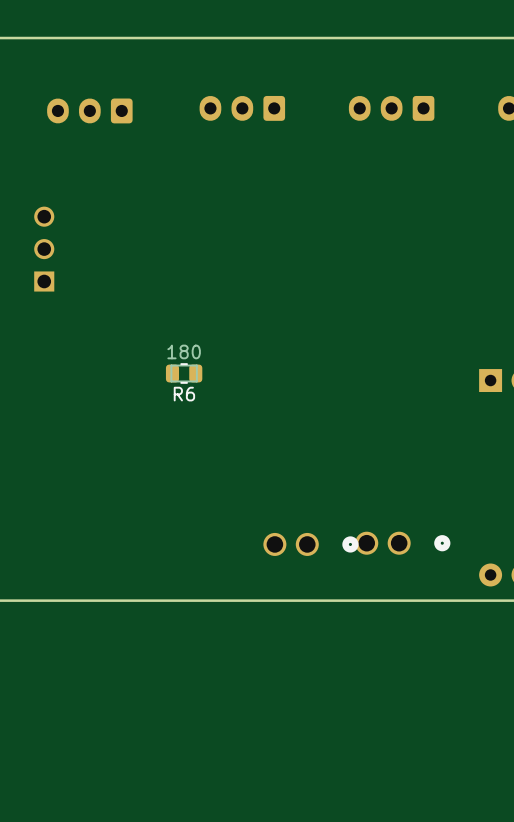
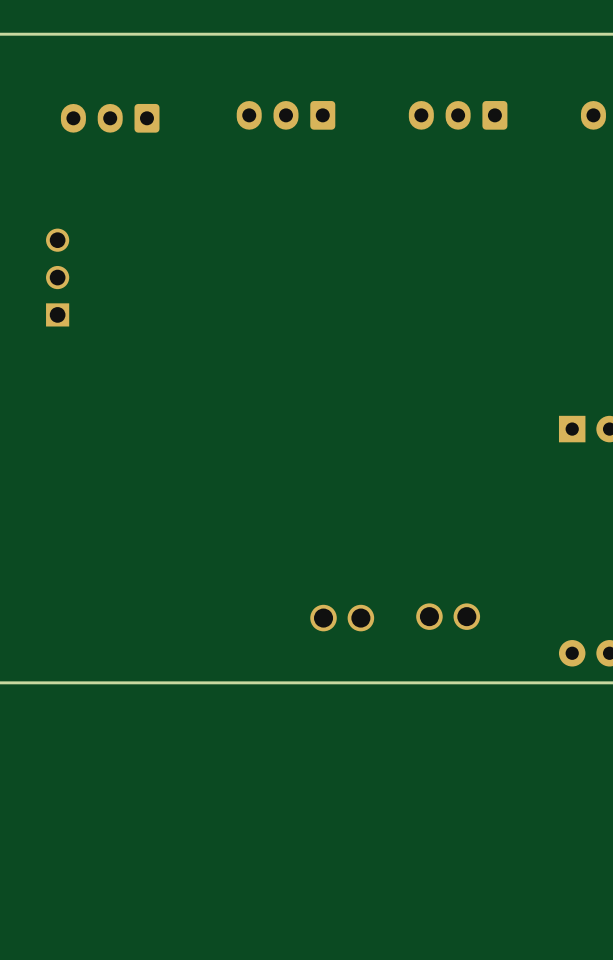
R6: 180 (184, 373) -> none
part: none -> (448, 616)
part: (402, 543) -> none
part: (310, 544) -> none

